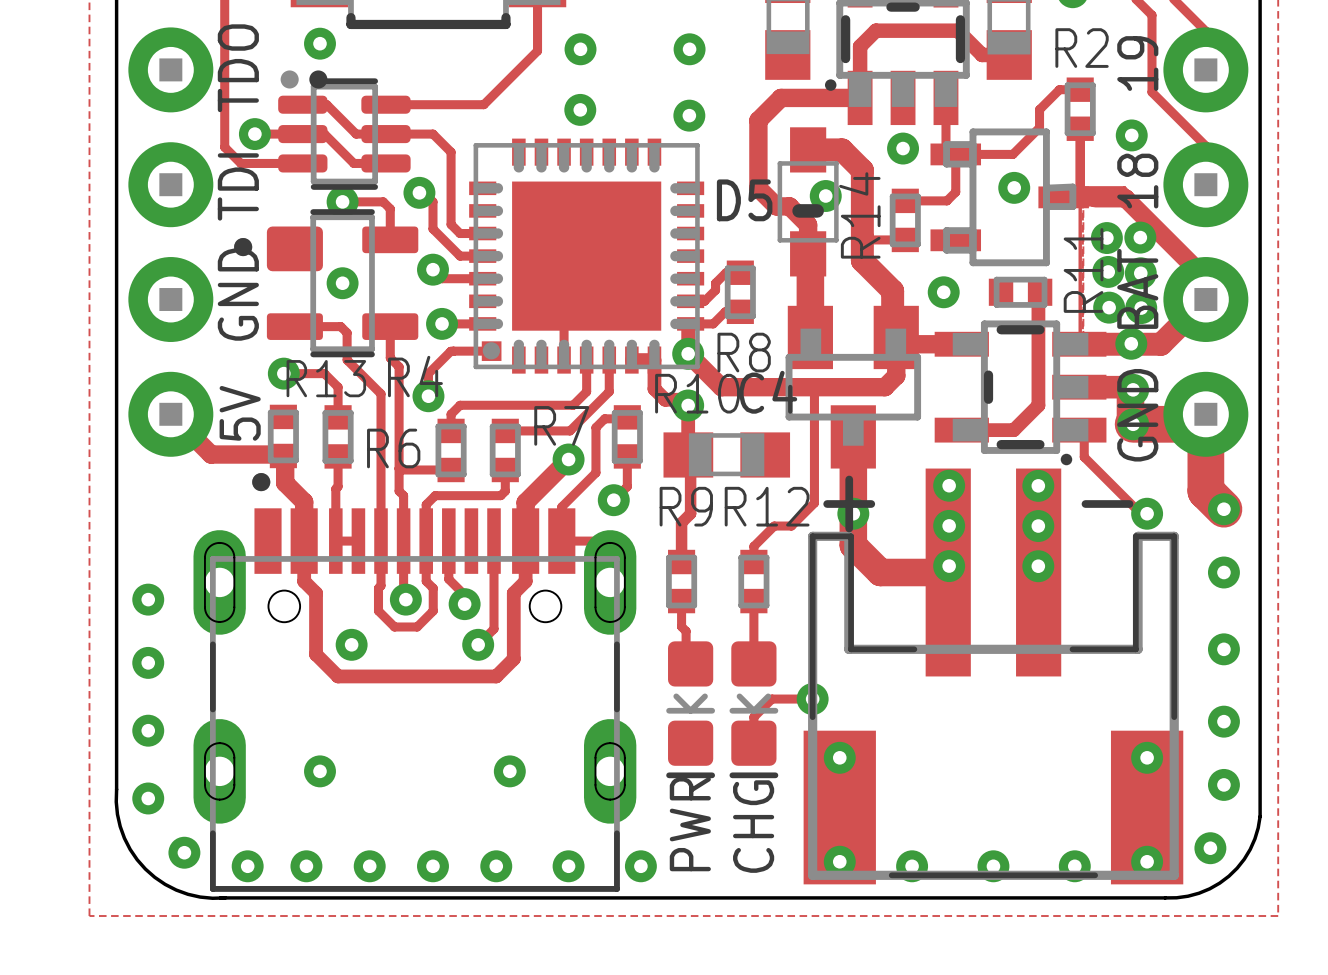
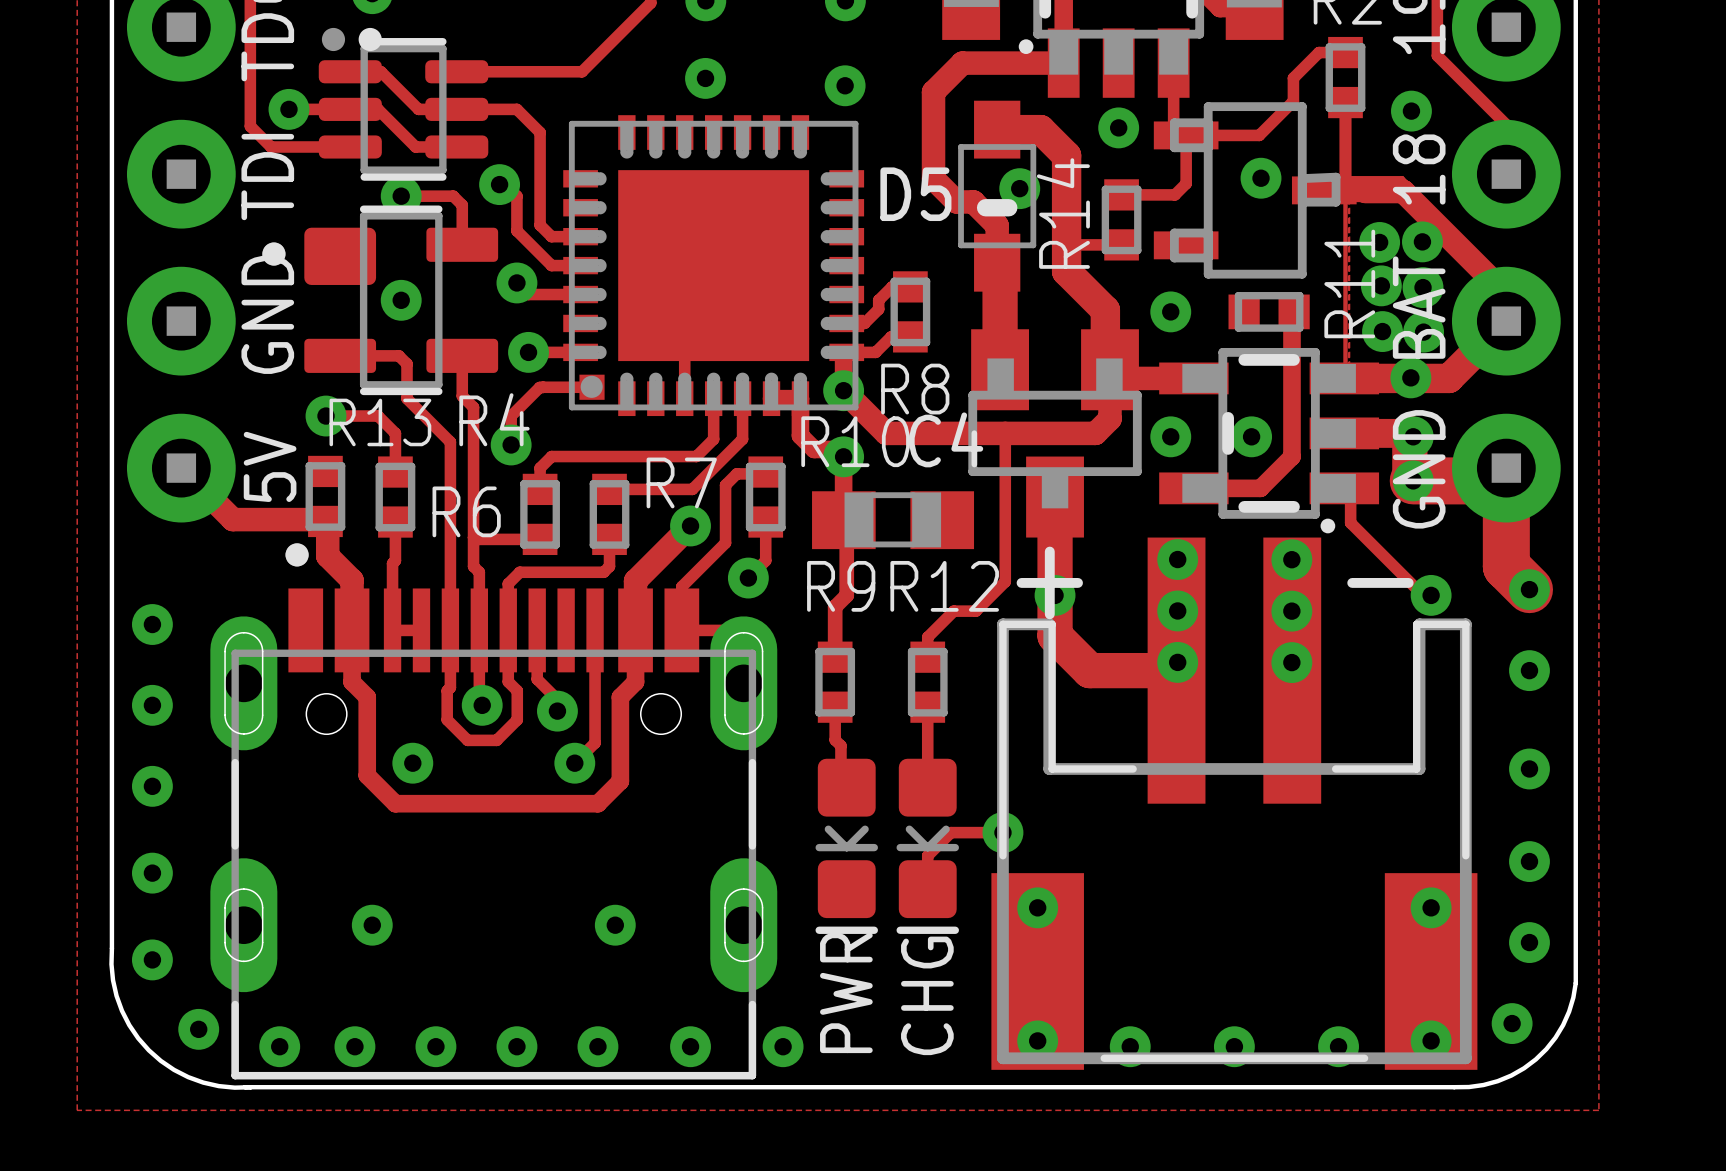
via: none -> (1170, 436)
via: none -> (1251, 436)
via: none -> (152, 624)

